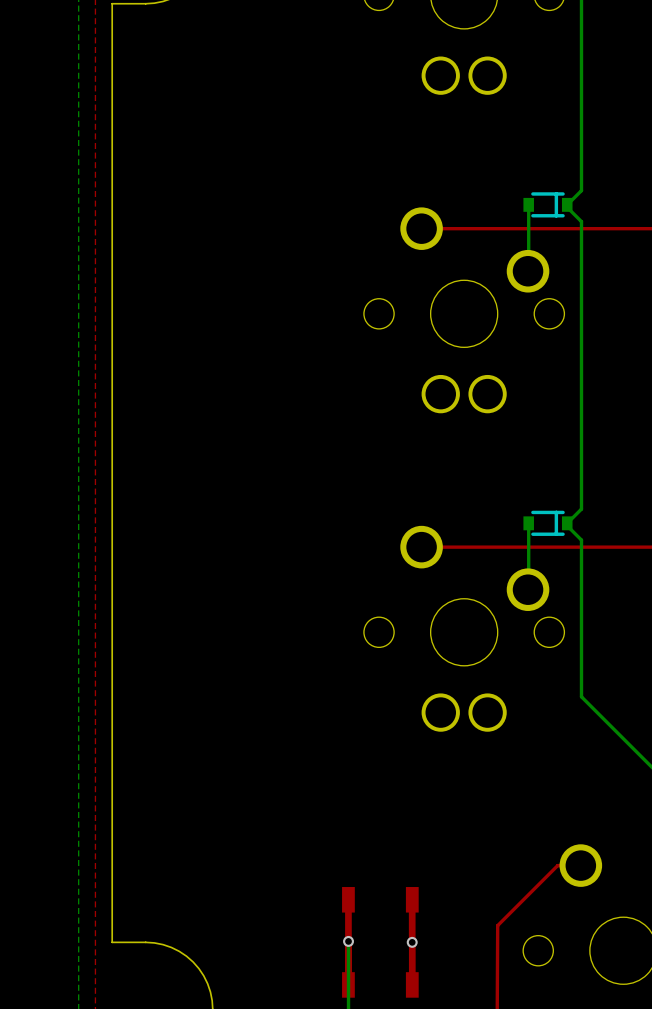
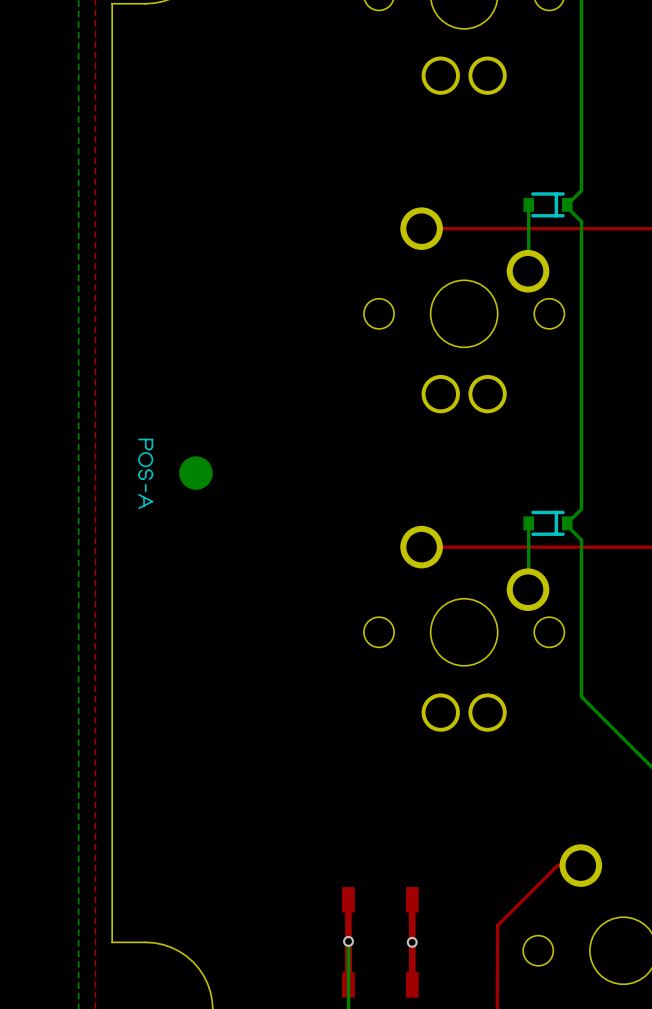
line: none -> (145, 439) (145, 446) (146, 447) (150, 449) (152, 439) (139, 439)
drawing: none -> [138, 452, 154, 468]
drawing: none -> [179, 456, 213, 490]
line: none -> (141, 470) (138, 475) (142, 479) (145, 477) (146, 470) (151, 471) (152, 475) (149, 478)
line: none -> (145, 484) (145, 491)
line: none -> (139, 494) (152, 501) (139, 508)
line: none -> (144, 497) (144, 505)

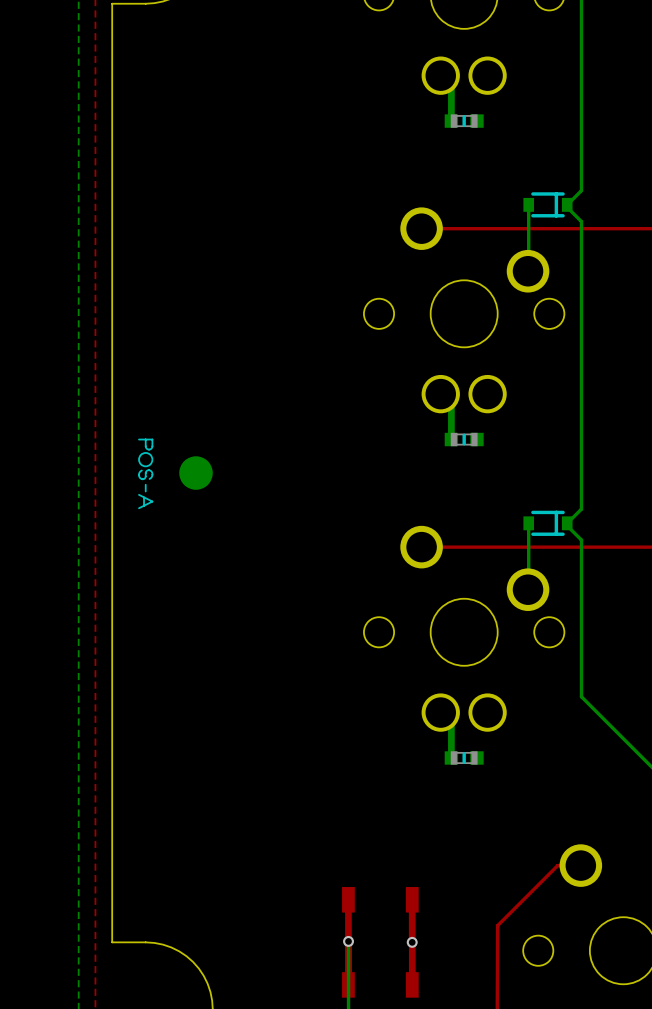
bottom track: none -> (440, 75) (451, 86) (451, 121)
part: none -> (464, 121)
bottom track: none -> (440, 394) (451, 404) (451, 439)
part: none -> (464, 439)
bottom track: none -> (440, 712) (451, 723) (451, 757)
part: none -> (464, 757)

